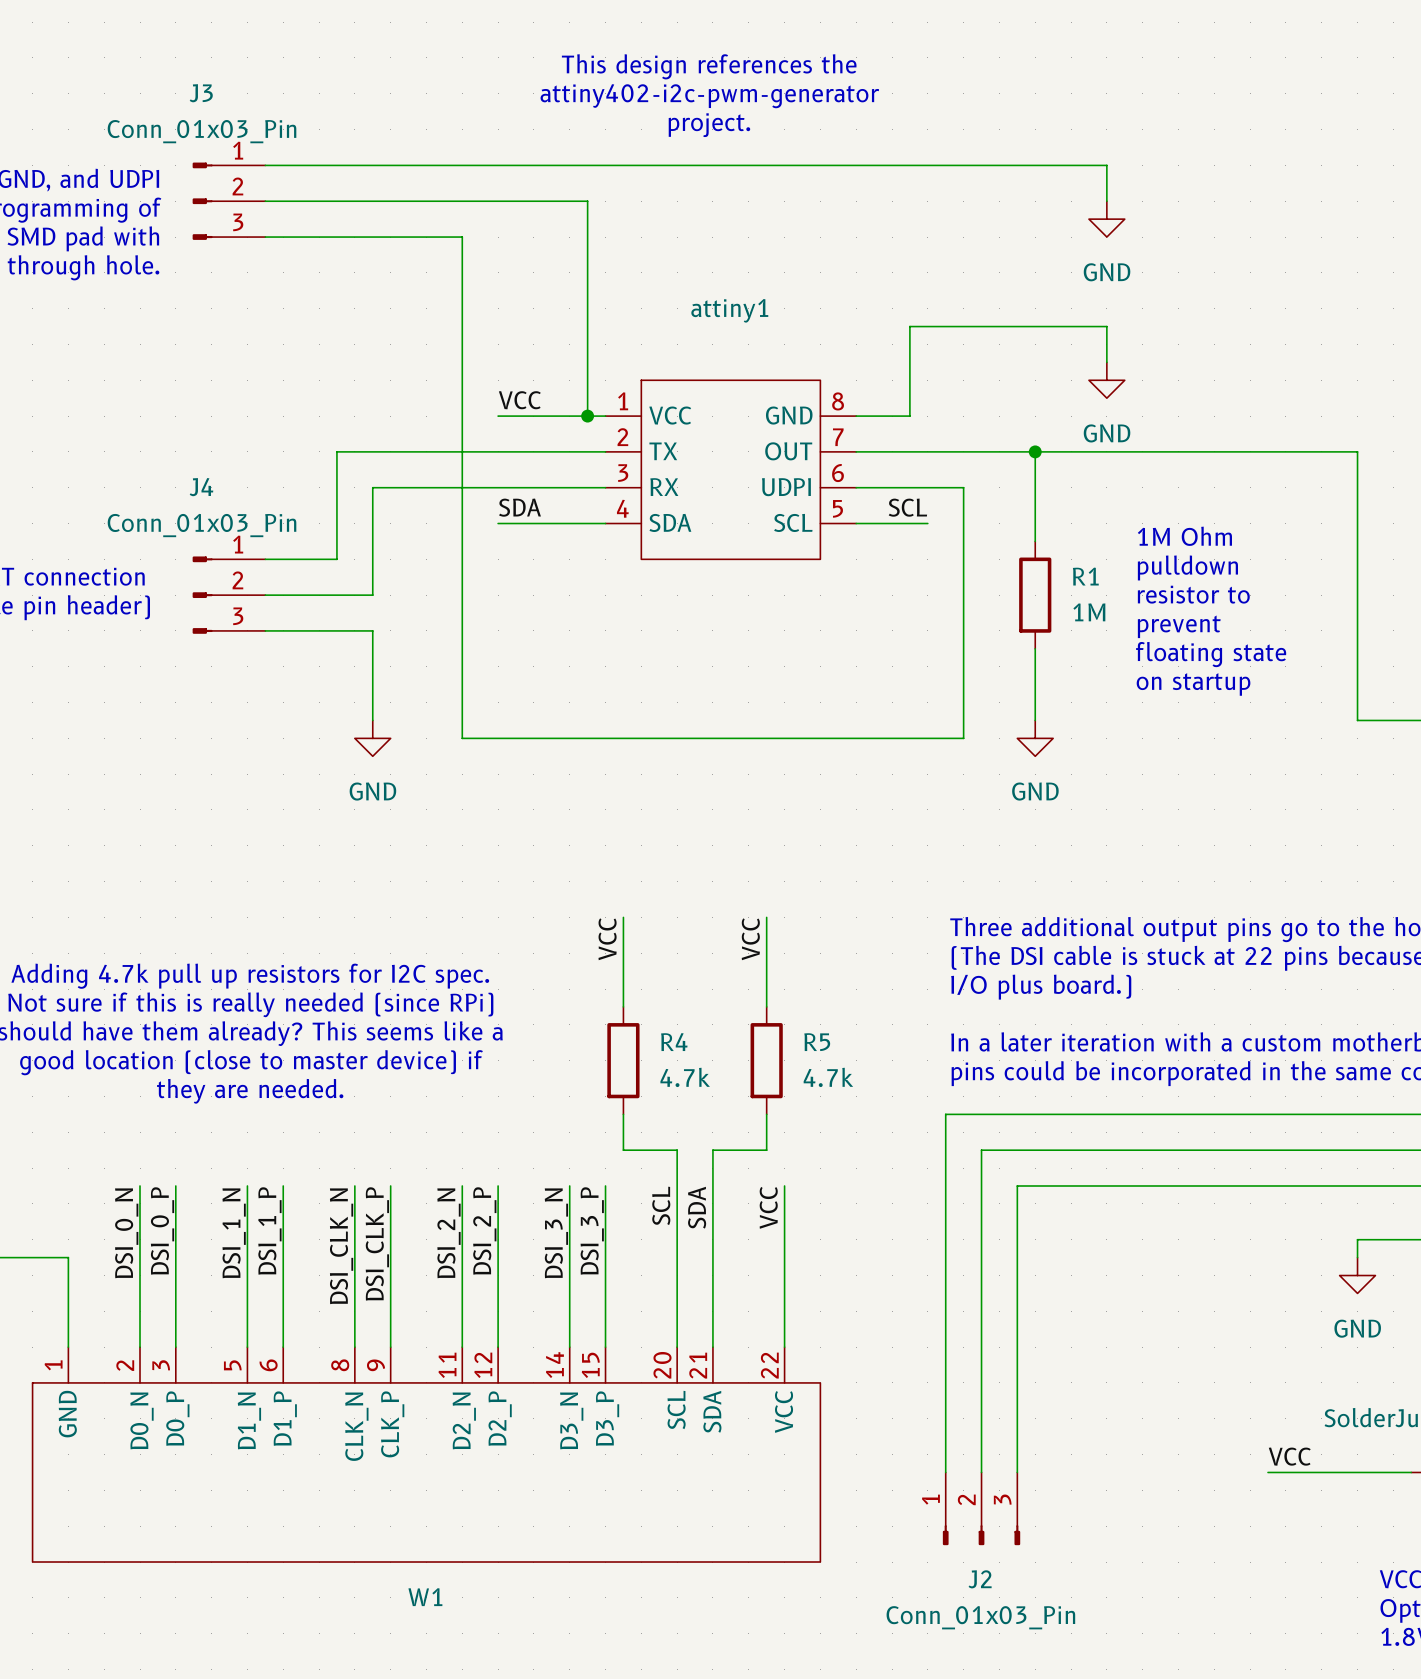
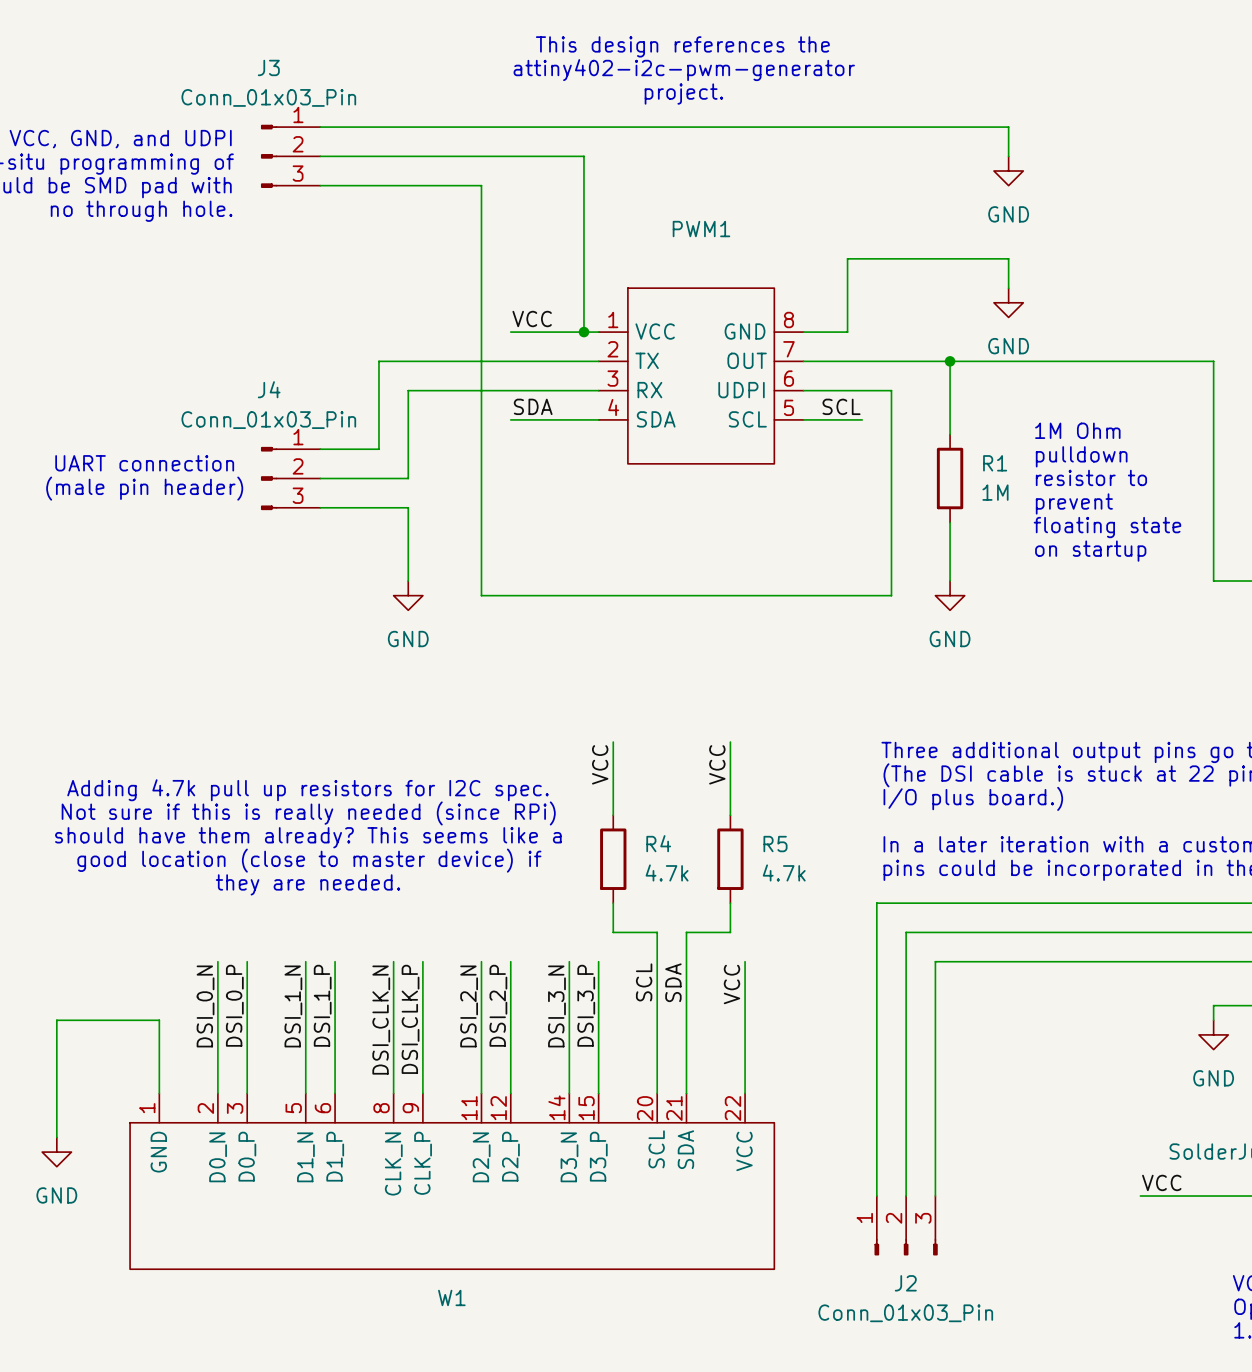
attiny1: (730, 469) -> none
PWM1: none -> (701, 376)

